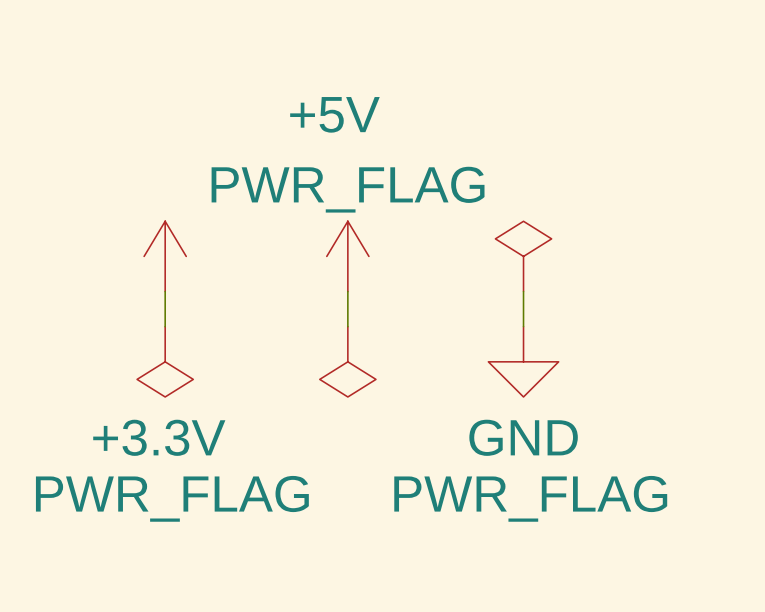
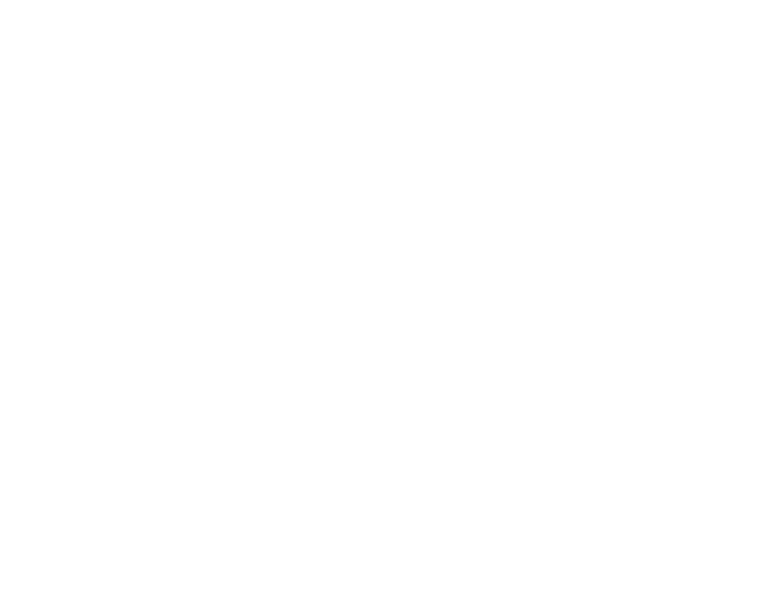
power symbol: +3.3V (165, 256) -> none
power symbol: +5V (347, 256) -> none
power symbol: PWR_FLAG (523, 256) -> none
wire: (165, 291) (165, 326) -> none
wire: (347, 291) (347, 326) -> none
wire: (523, 291) (523, 326) -> none
power symbol: PWR_FLAG (165, 361) -> none
power symbol: PWR_FLAG (347, 361) -> none
power symbol: GND (523, 361) -> none

